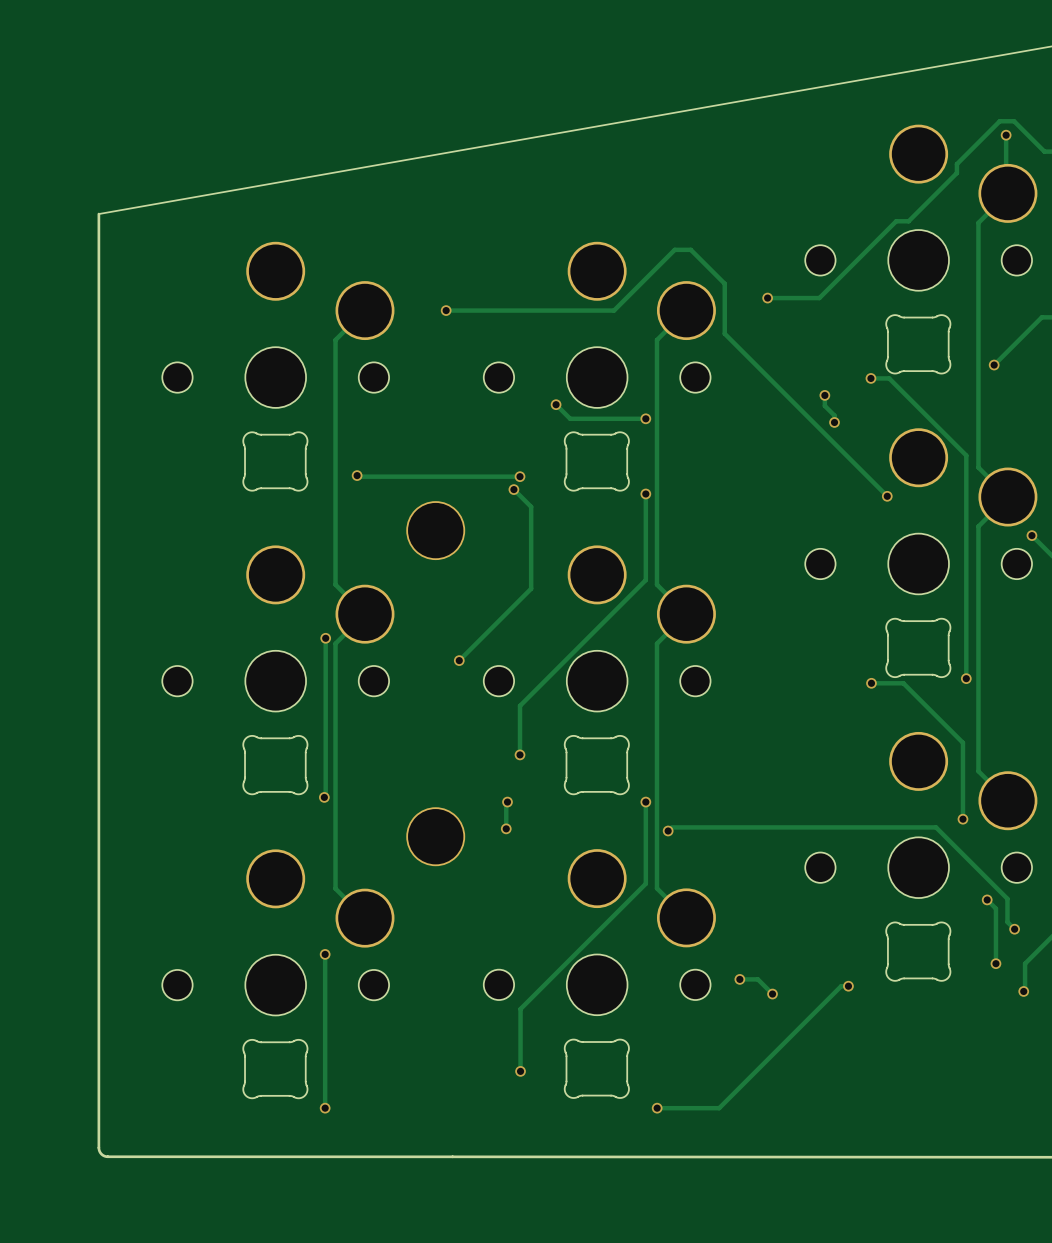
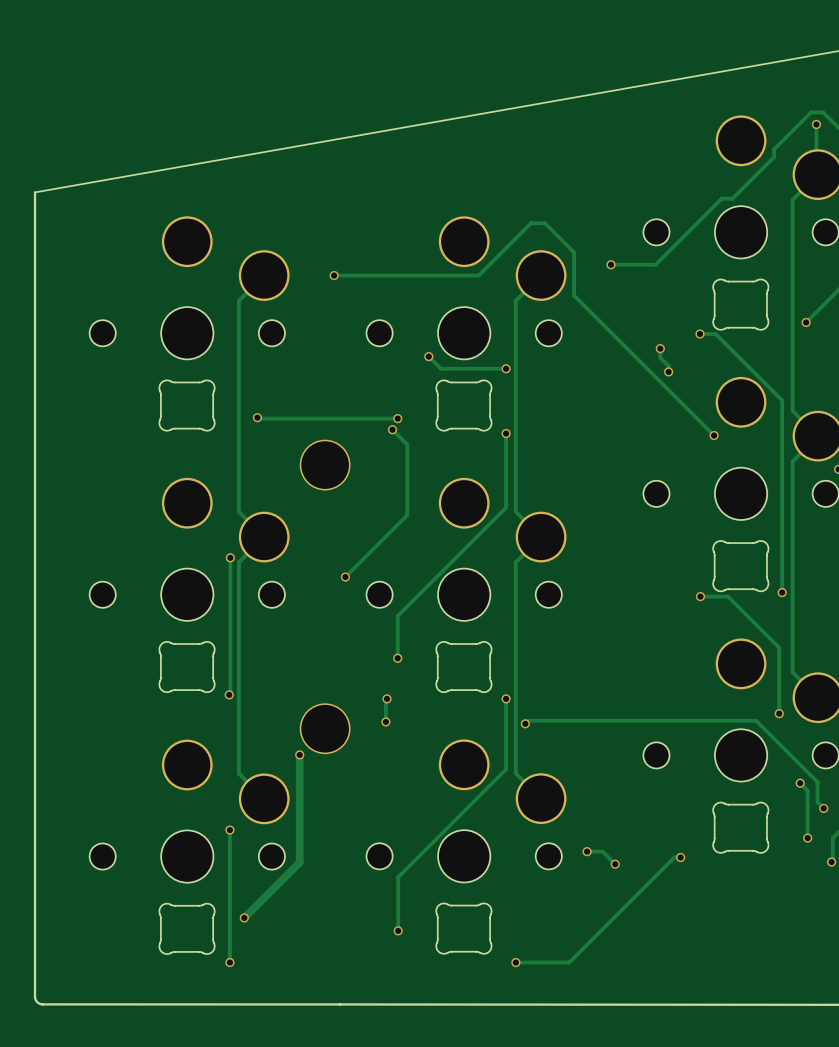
track: none -> (299, 754) (299, 862) (244, 917)
via: none -> (299, 754)
via: none -> (244, 917)

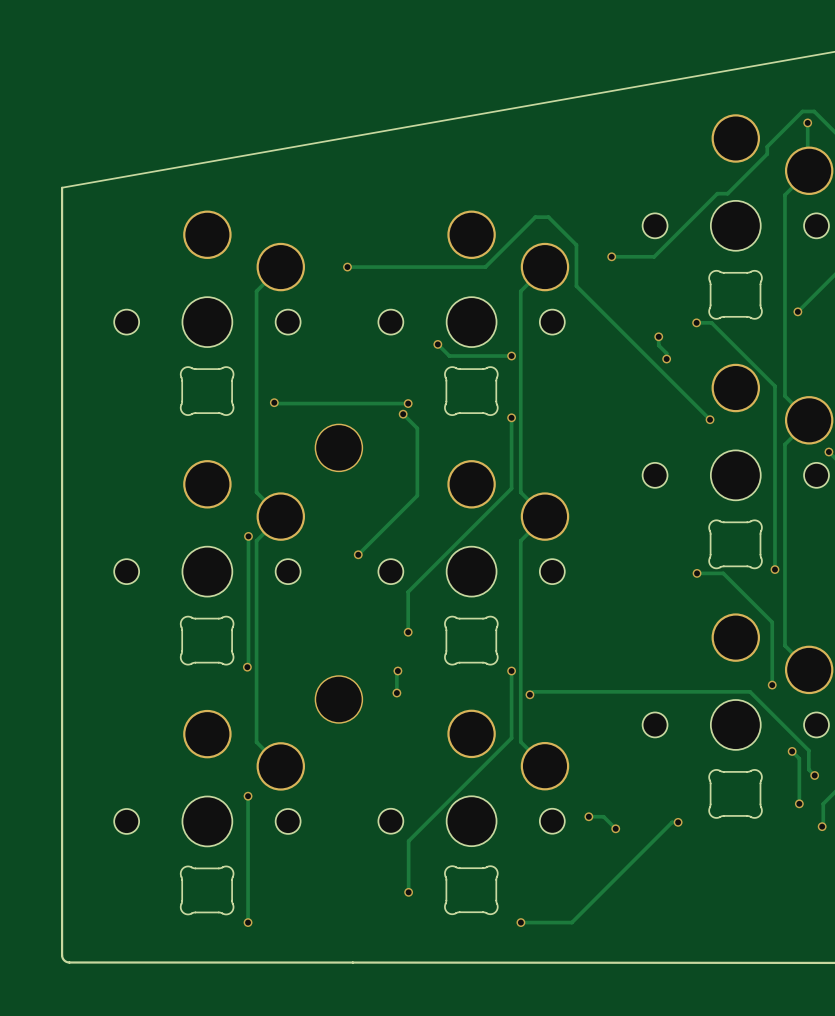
track: (299, 754) (299, 862) (244, 917) -> none
via: (299, 754) -> none
via: (244, 917) -> none

